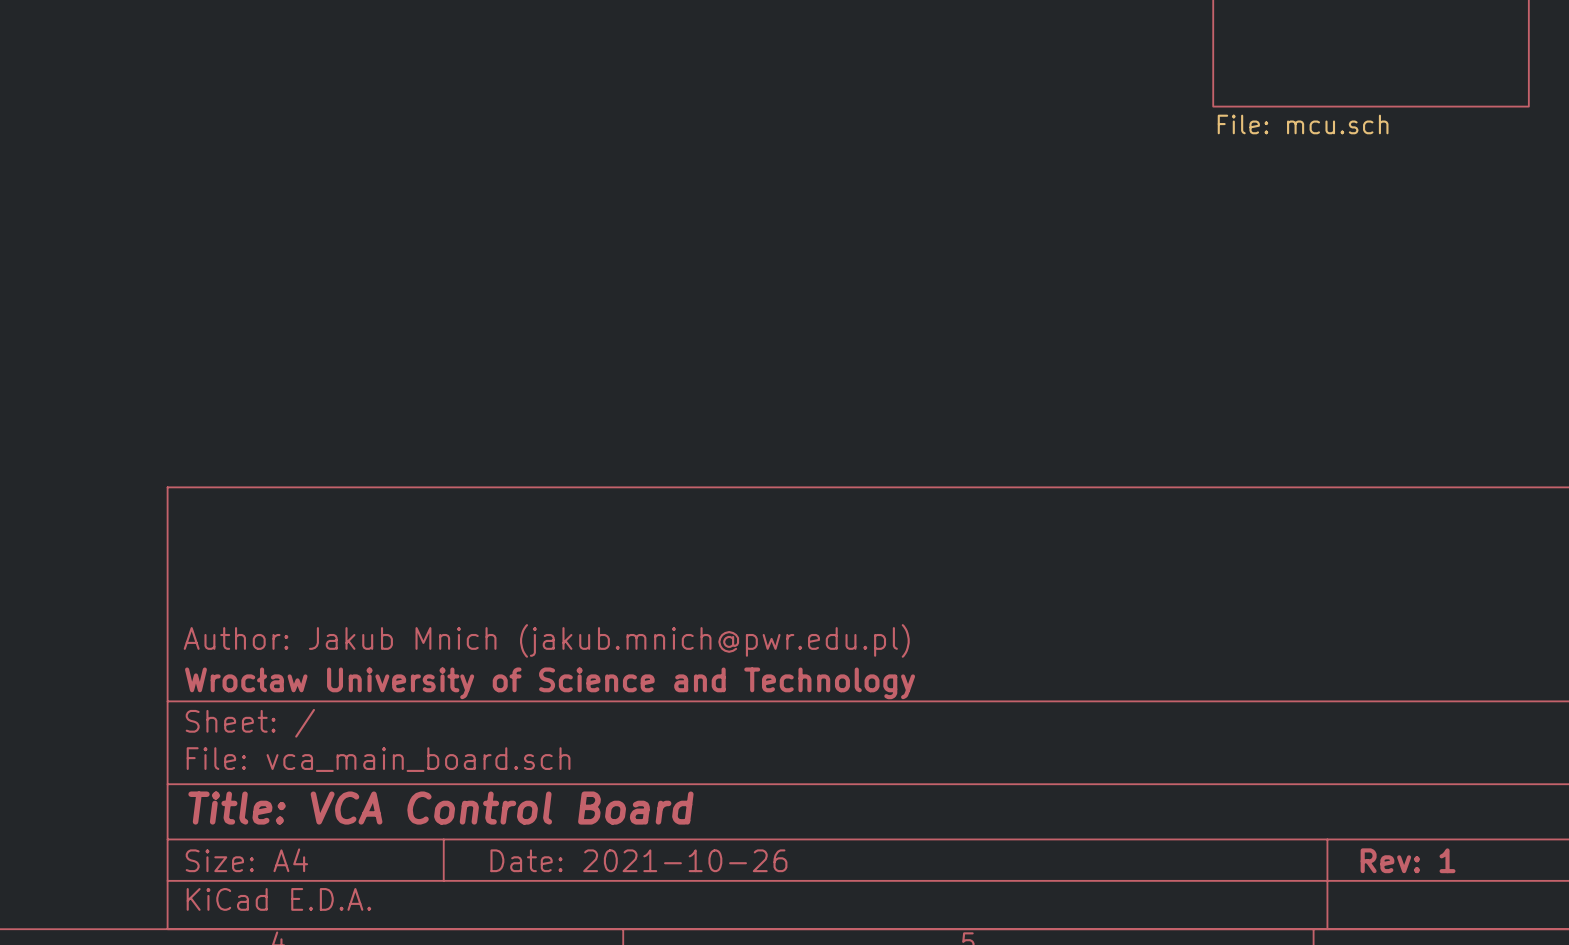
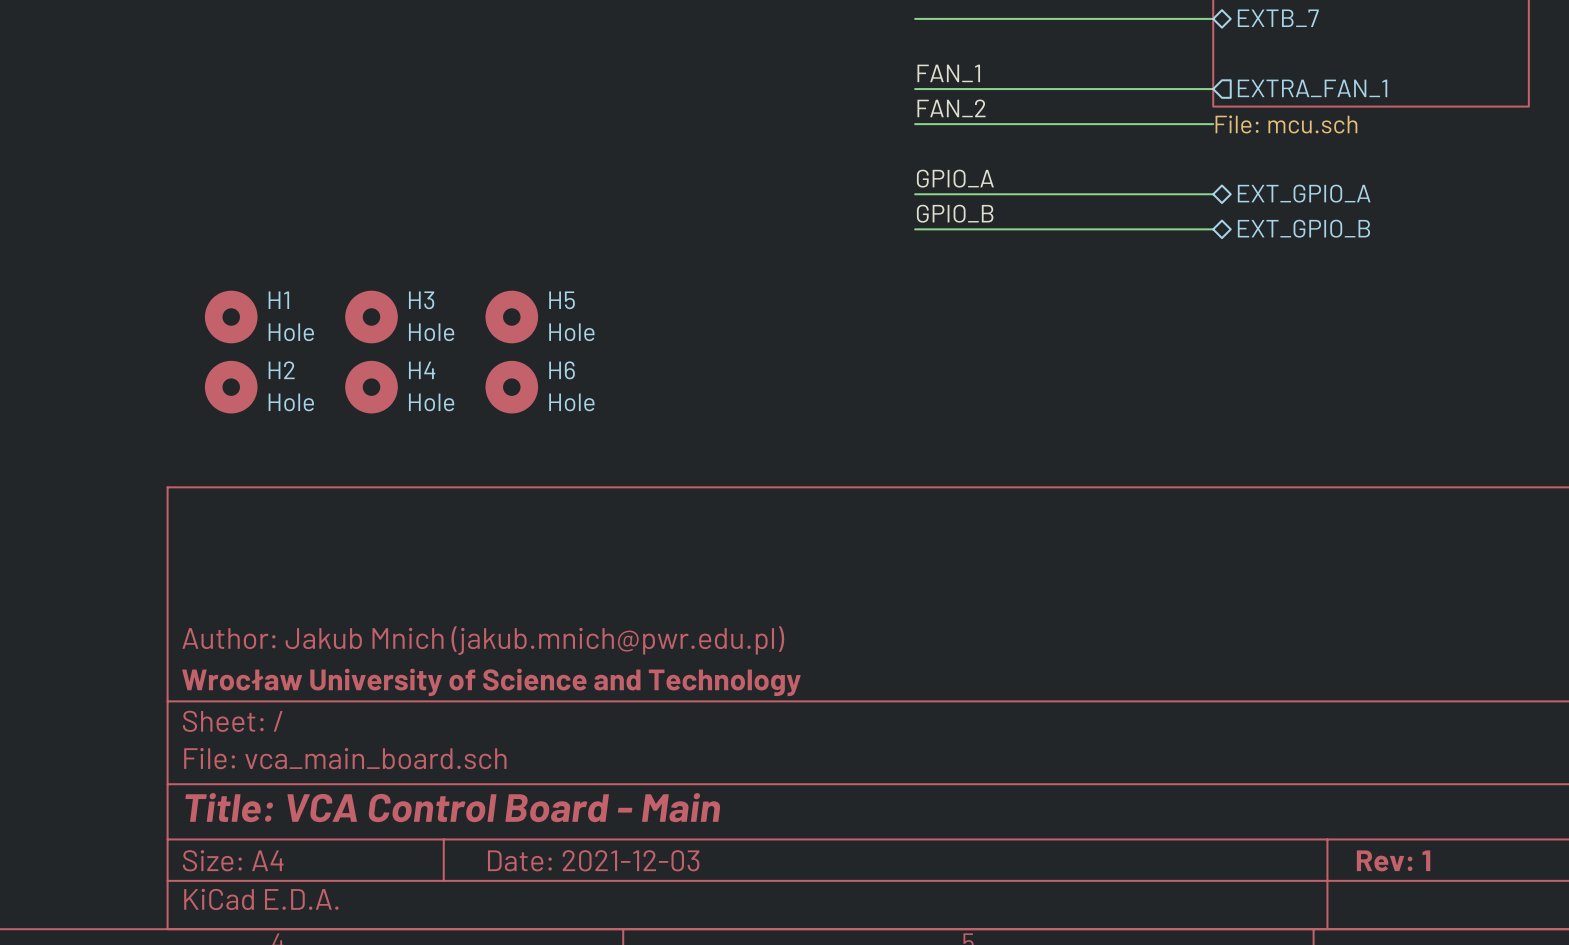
wire: none -> (915, 18) (1213, 18)
sheet pin: none -> EXTB_7 (1278, 18)
label: none -> FAN_1 (948, 73)
wire: none -> (915, 89) (1213, 89)
sheet pin: none -> EXTRA_FAN_1 (1312, 88)
label: none -> FAN_2 (951, 108)
wire: none -> (915, 124) (1213, 124)
label: none -> GPIO_A (955, 178)
wire: none -> (915, 194) (1213, 194)
sheet pin: none -> EXT_GPIO_A (1304, 193)
label: none -> GPIO_B (955, 213)
wire: none -> (915, 229) (1213, 229)
sheet pin: none -> EXT_GPIO_B (1303, 228)
H1: none -> Hole (231, 317)
H3: none -> Hole (371, 317)
H5: none -> Hole (511, 317)
H2: none -> Hole (231, 387)
H4: none -> Hole (371, 387)
H6: none -> Hole (511, 387)
title block: Title: VCA Control Board (440, 808) -> Title: VCA Control Board - Main (452, 807)
title block: Date: 2021-10-26 (638, 860) -> Date: 2021-12-03 (593, 860)

